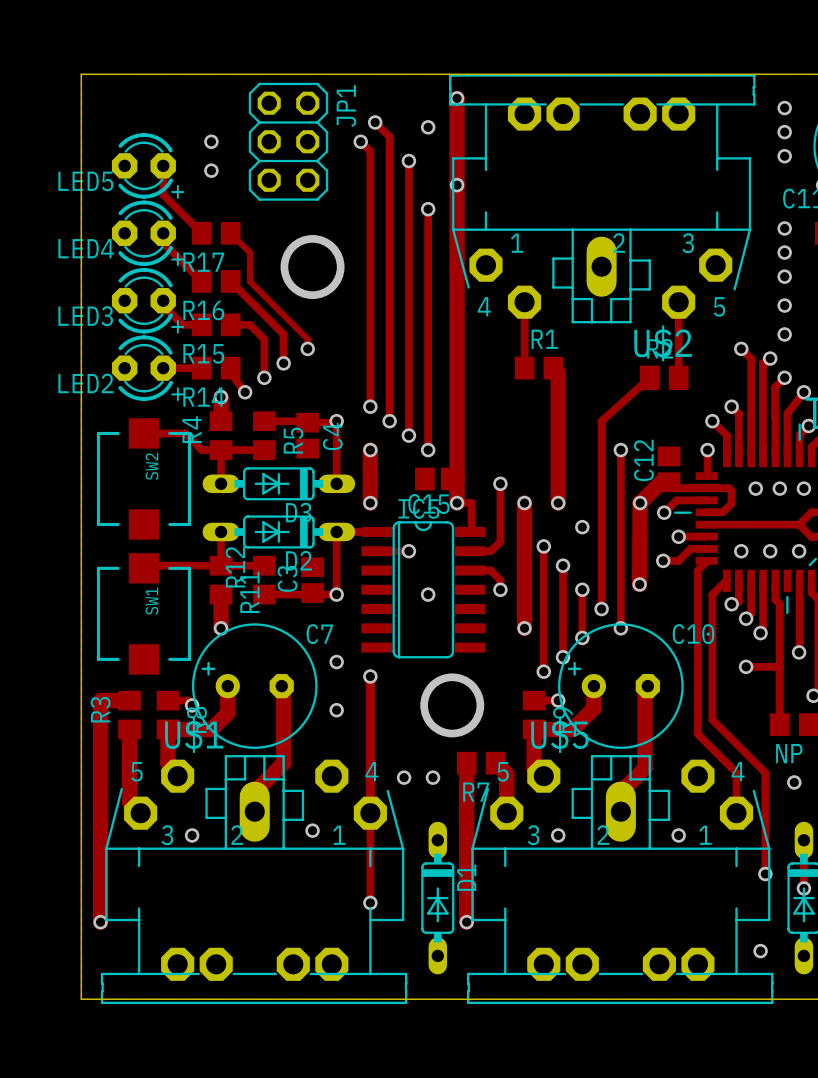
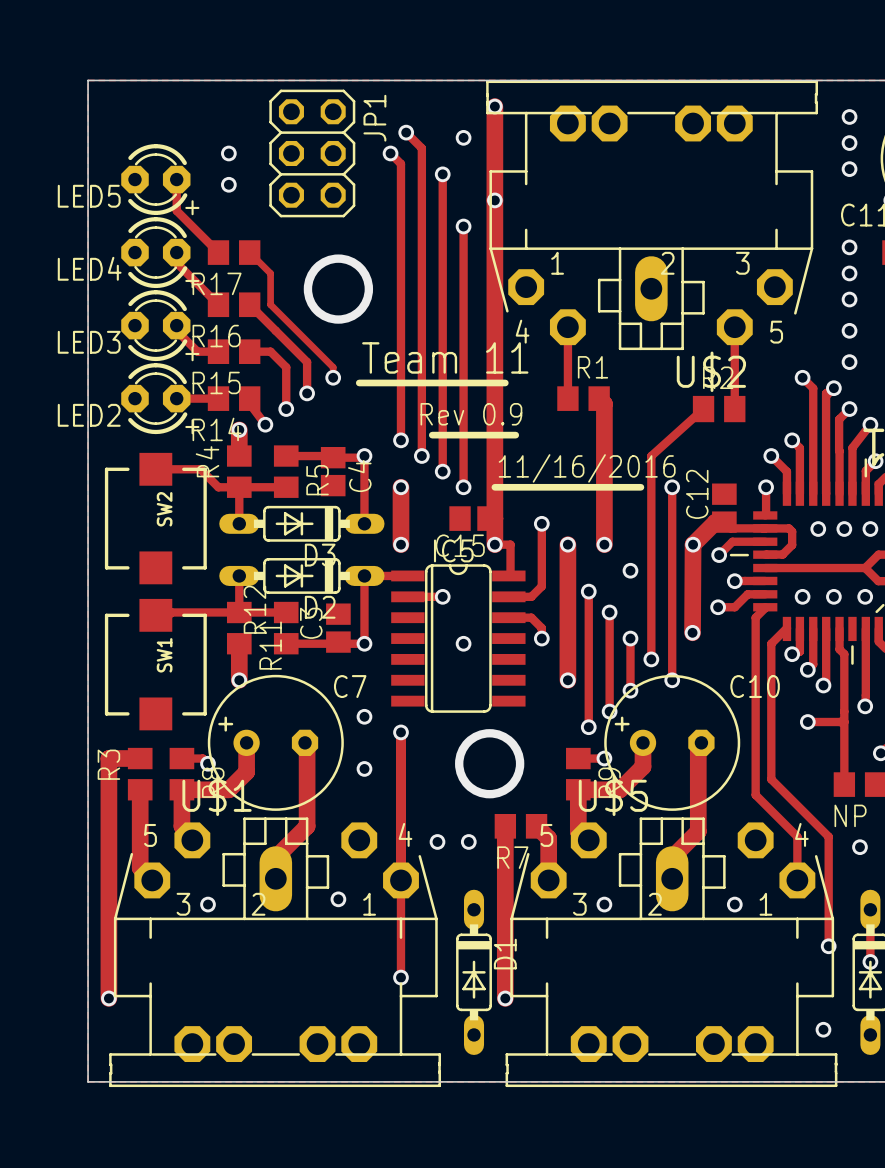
text: none -> Team 11 (445, 357)
line: none -> (359, 382) (505, 382)
text: none -> Rev 0.9 (471, 414)
line: none -> (432, 435) (515, 435)
text: none -> 11/16/2016 (587, 468)
line: none -> (494, 487) (640, 487)

